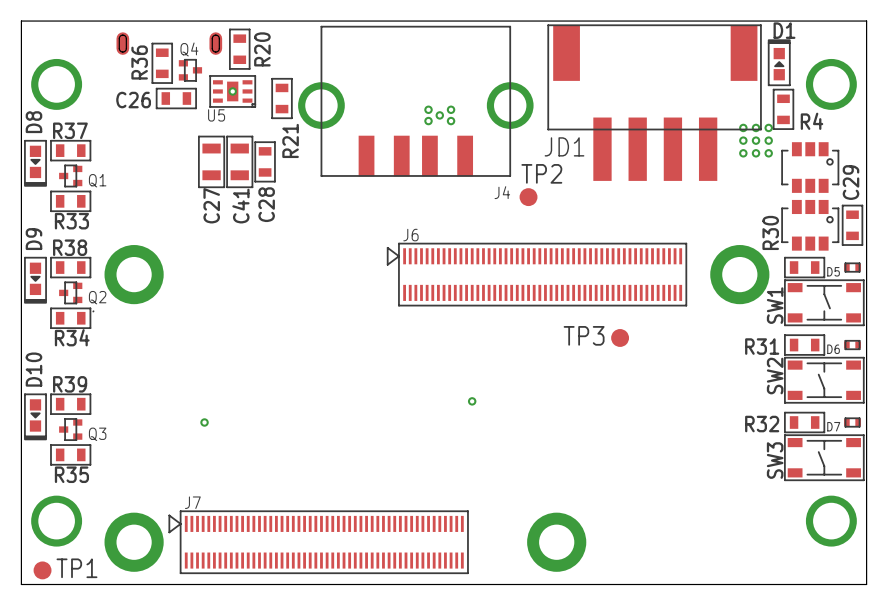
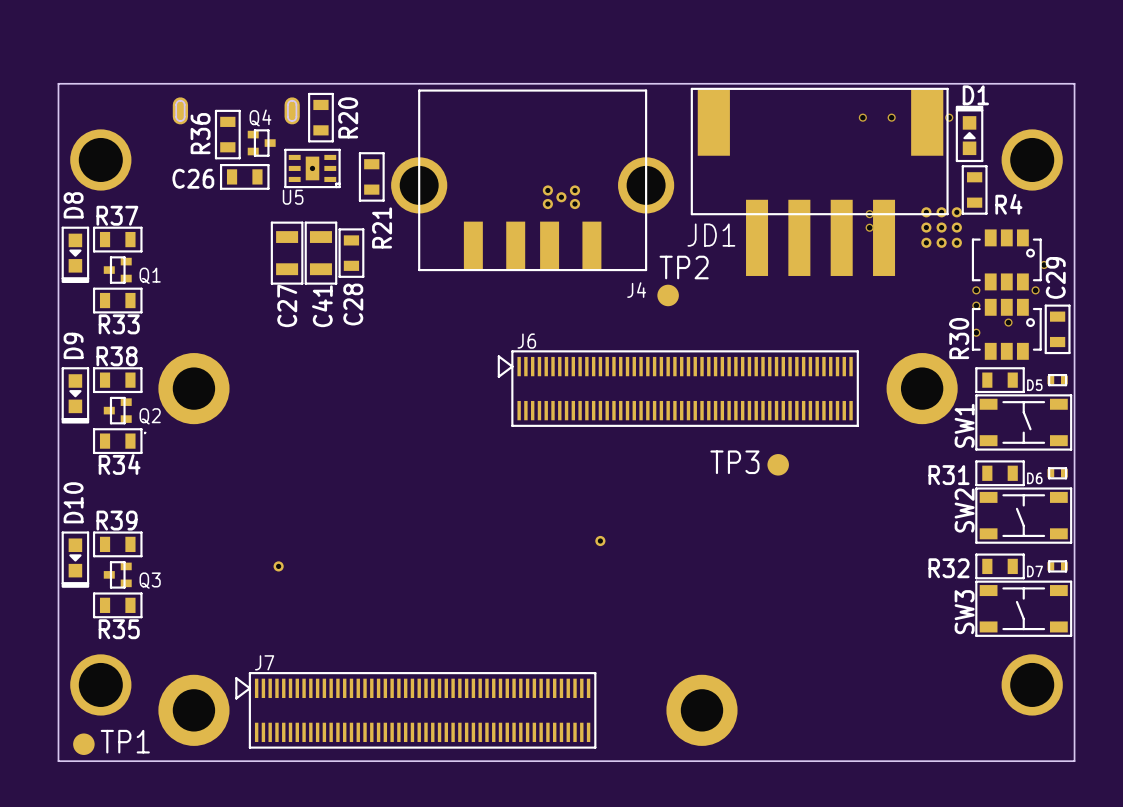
via: none -> (862, 117)
via: none -> (891, 117)
via: none -> (949, 117)
via: none -> (869, 214)
via: none -> (869, 227)
via: none -> (1044, 264)
via: none -> (976, 290)
via: none -> (1035, 290)
via: none -> (976, 305)
via: none -> (1008, 322)
via: none -> (976, 332)

